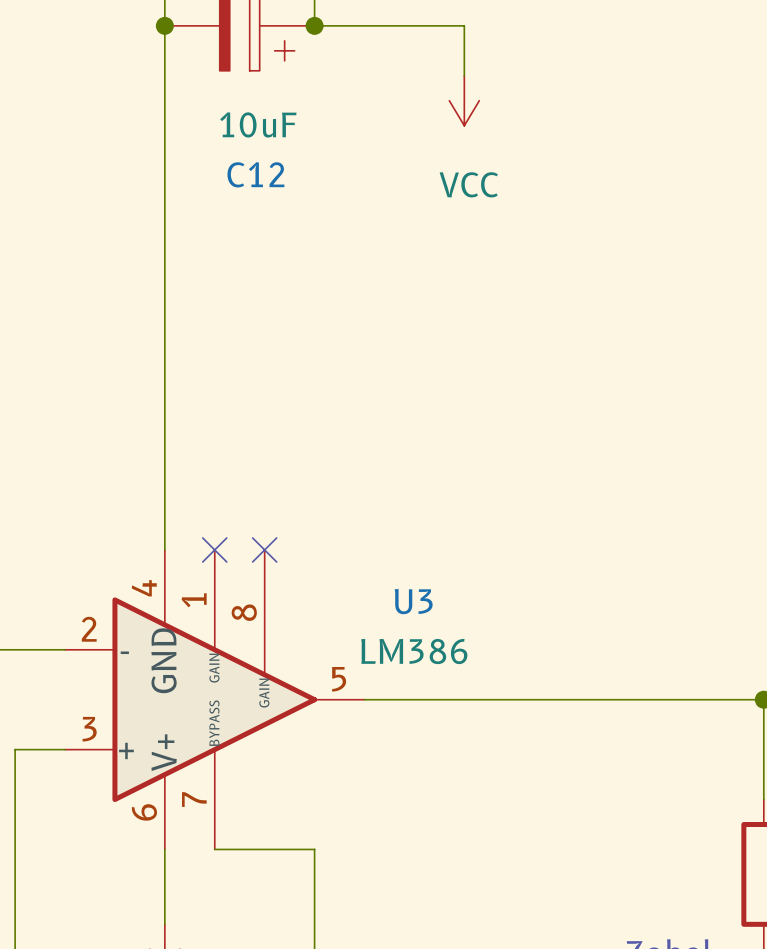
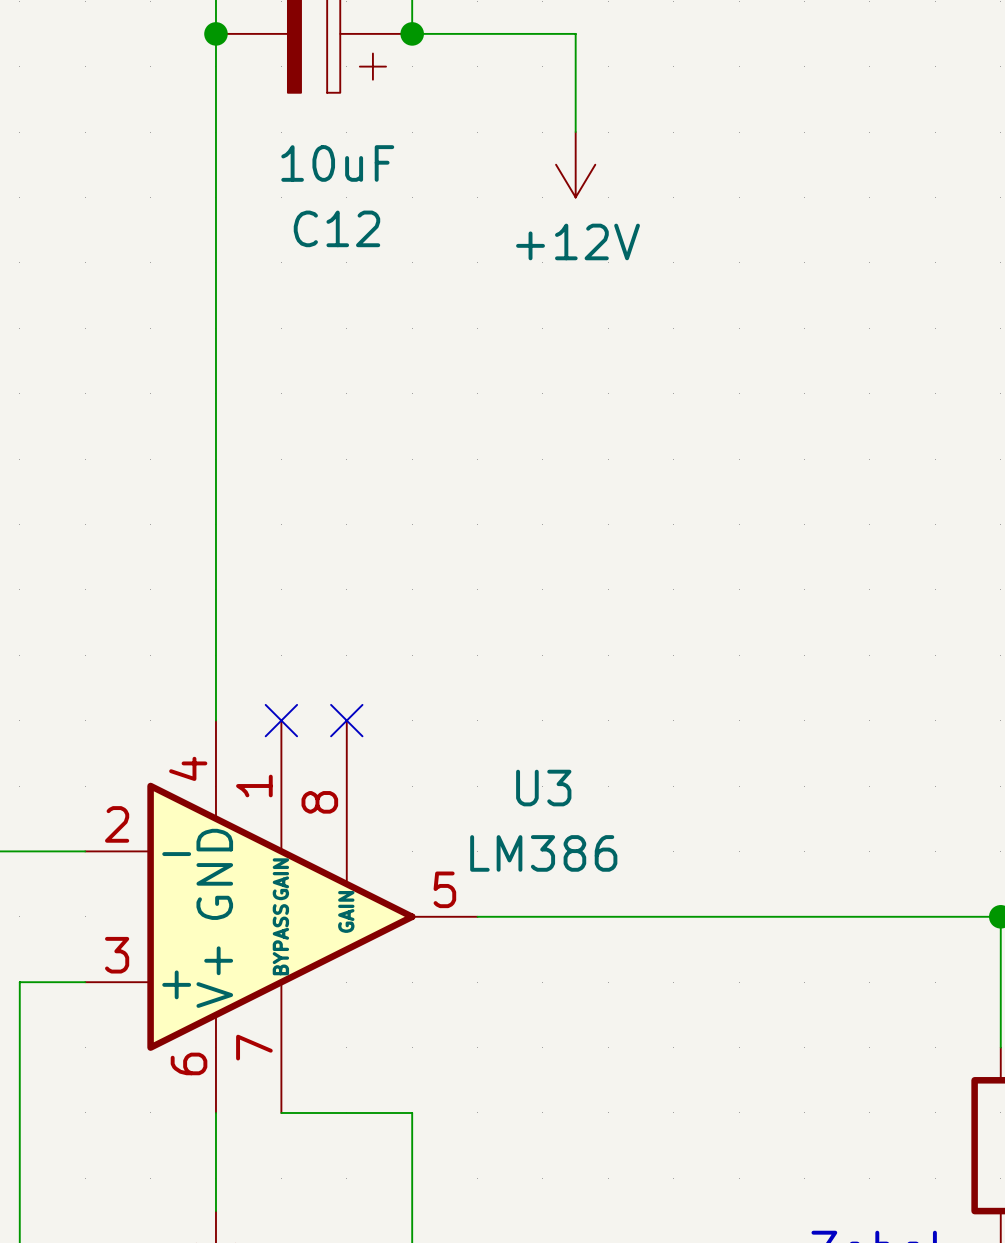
wire: (439, 25) (464, 25) (464, 75) -> (575, 33) (575, 132)
power symbol: VCC (464, 100) -> none
power symbol: none -> +12V (575, 164)

